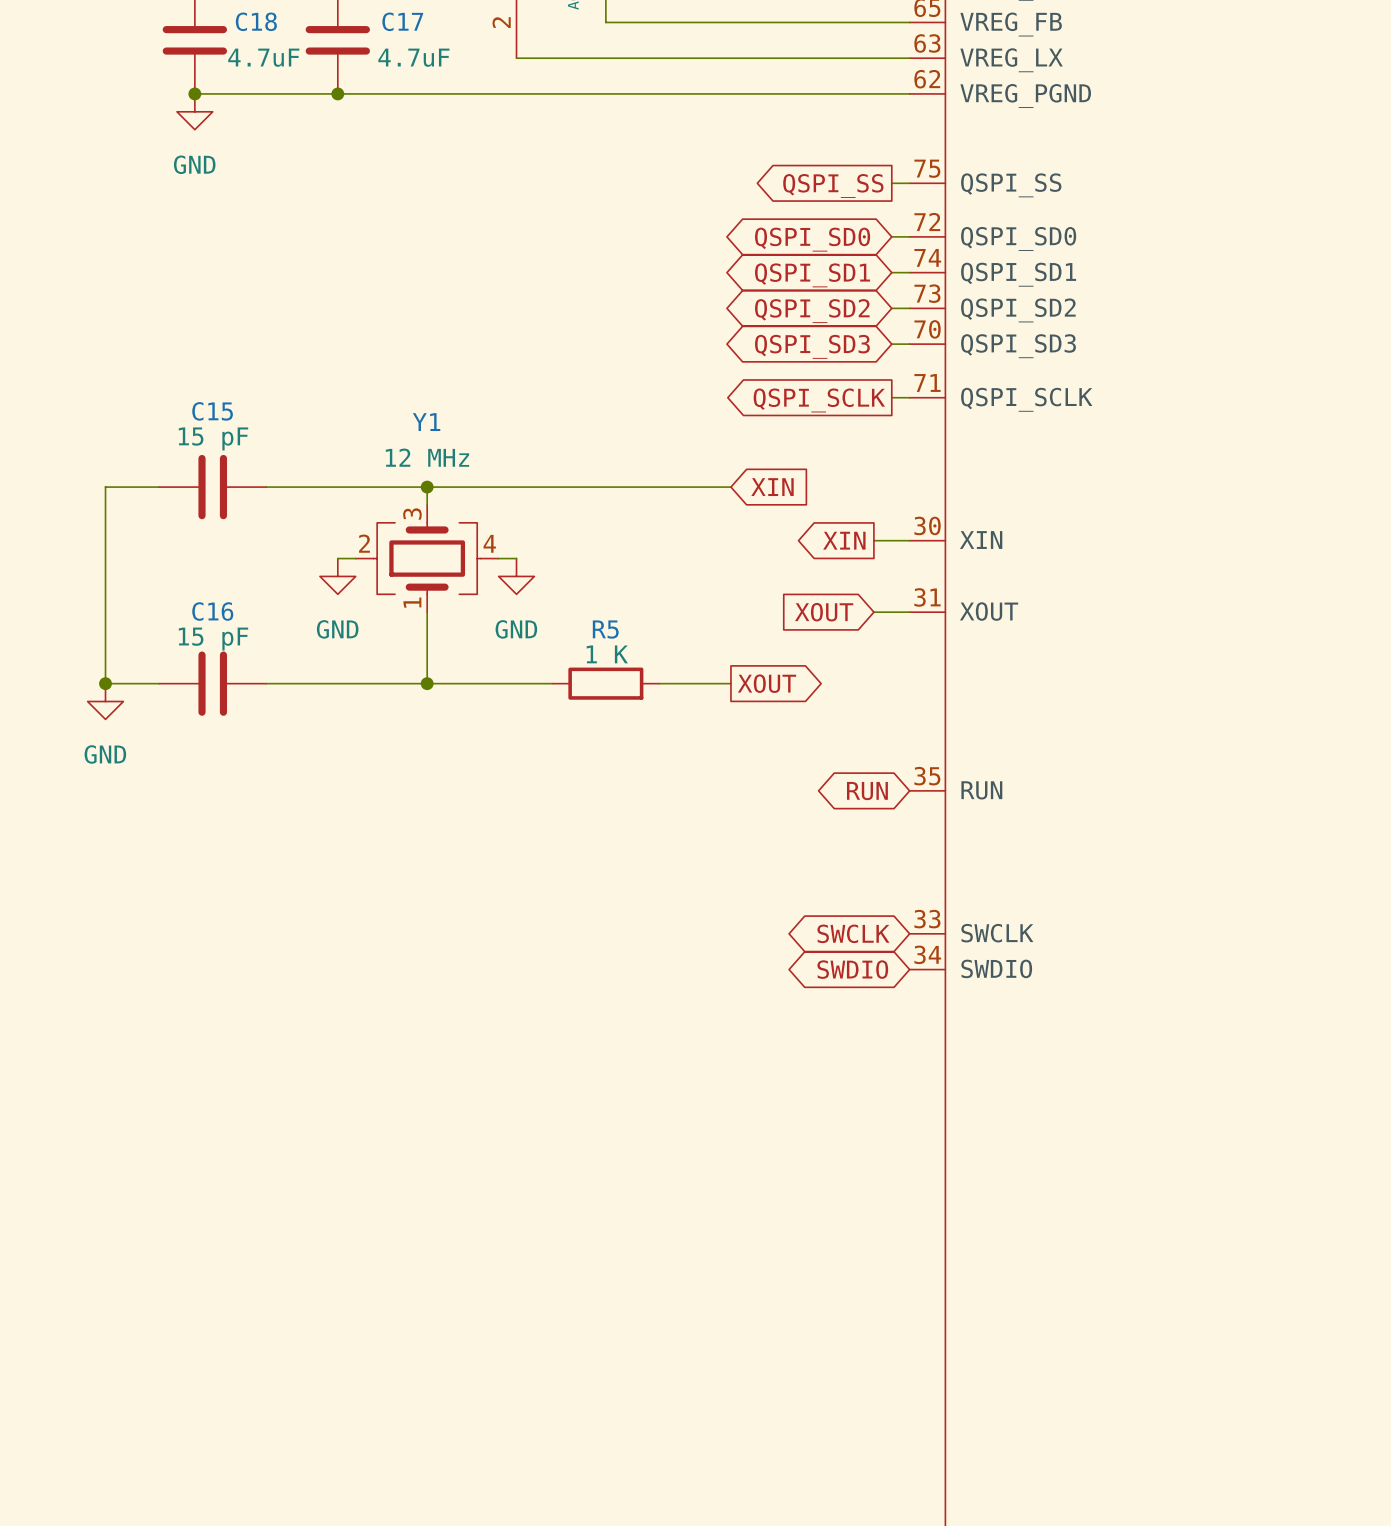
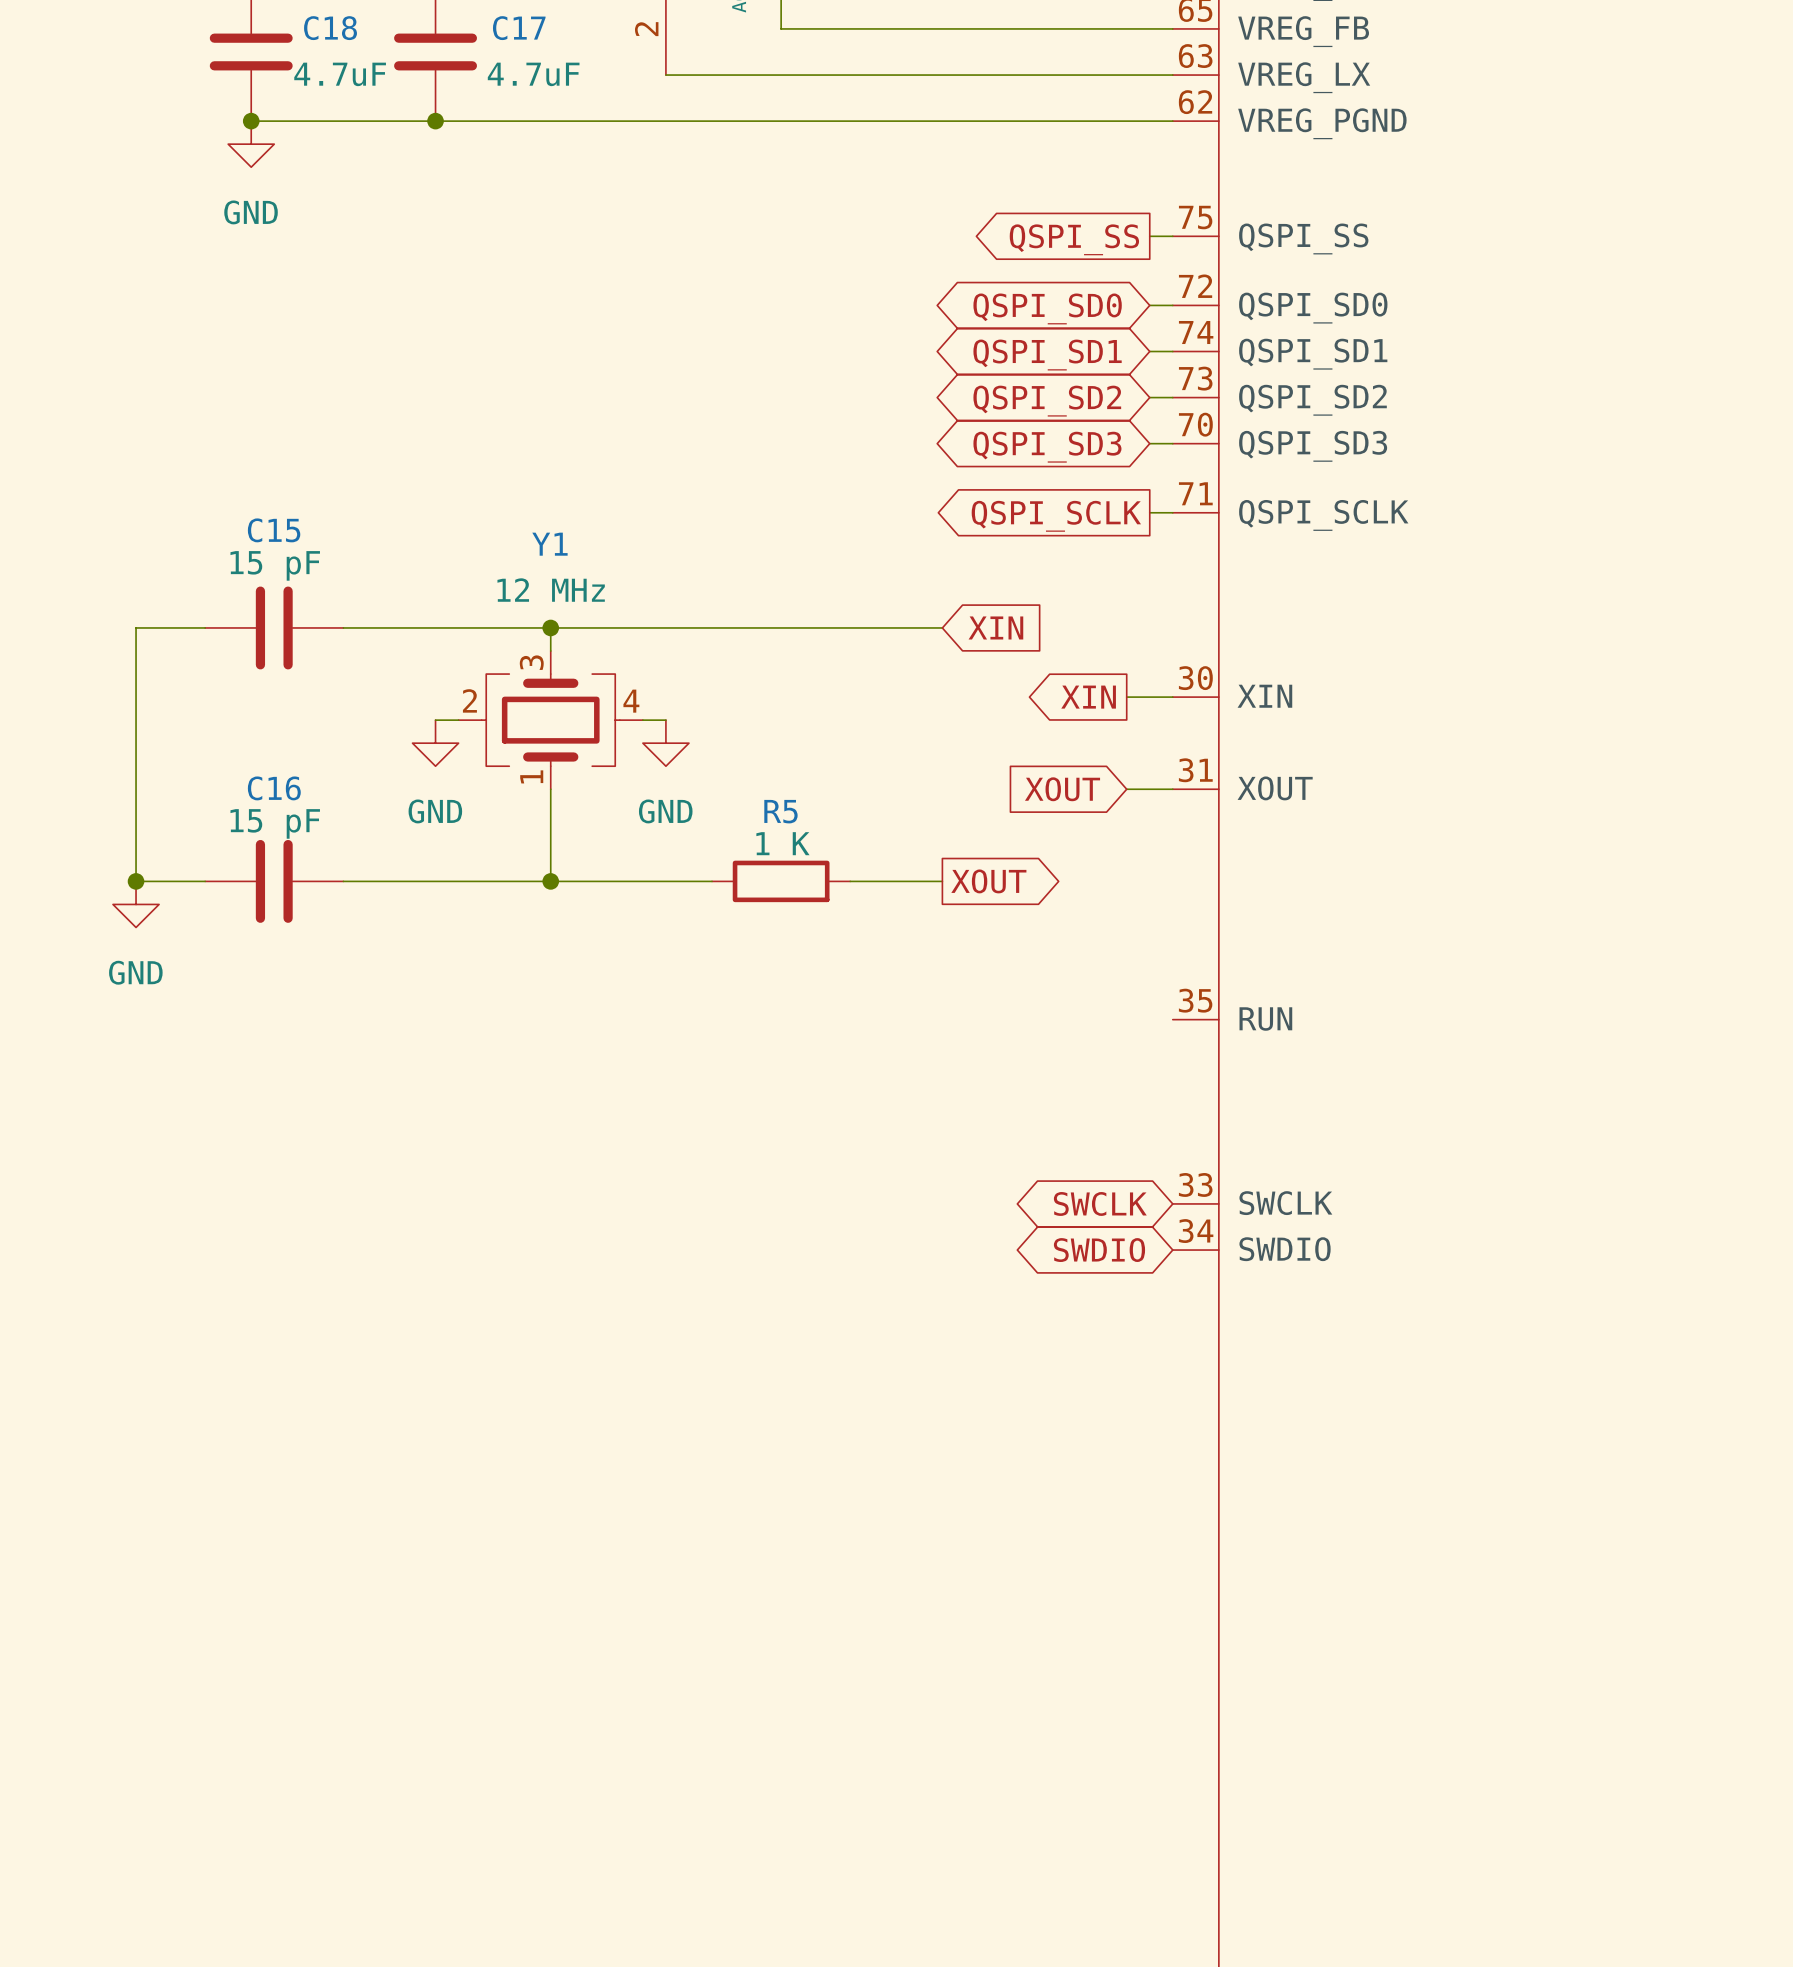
global label: RUN (867, 791) -> none

